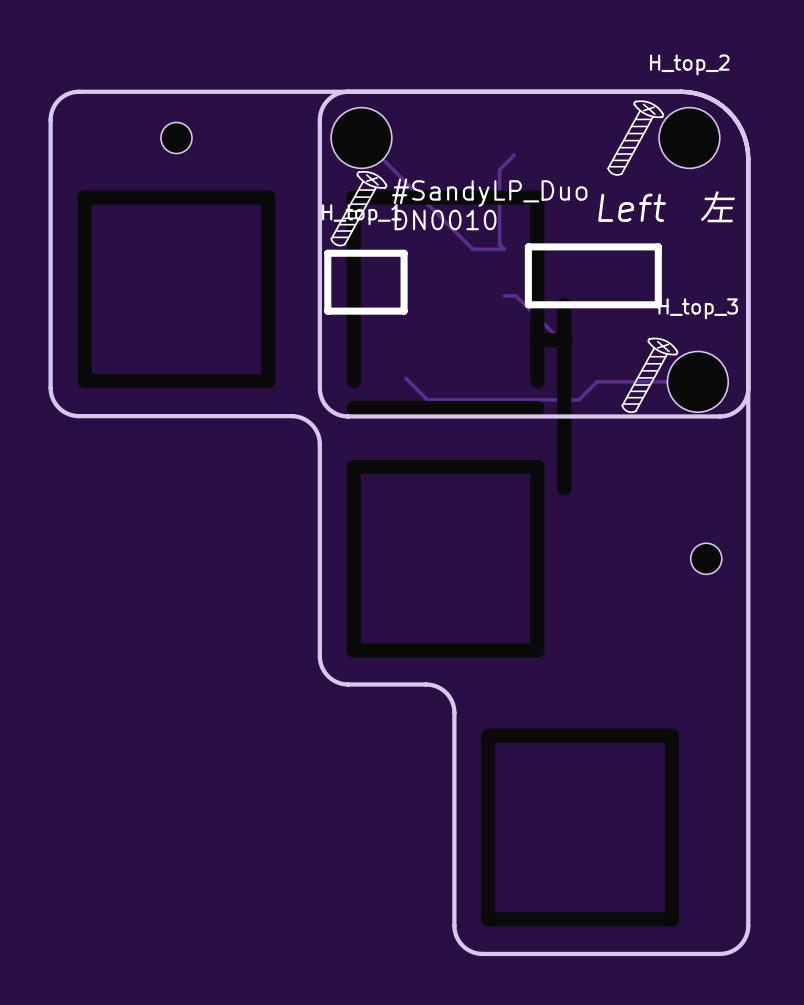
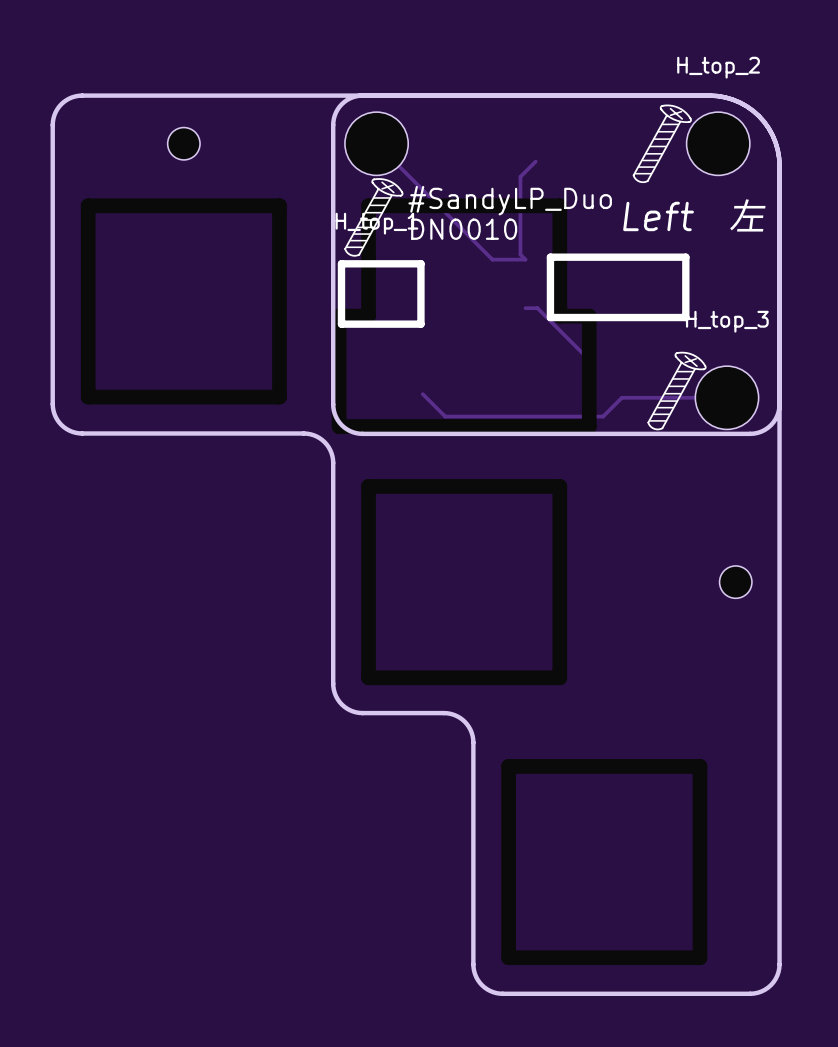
part: none -> (464, 316)
part: (459, 343) -> none

